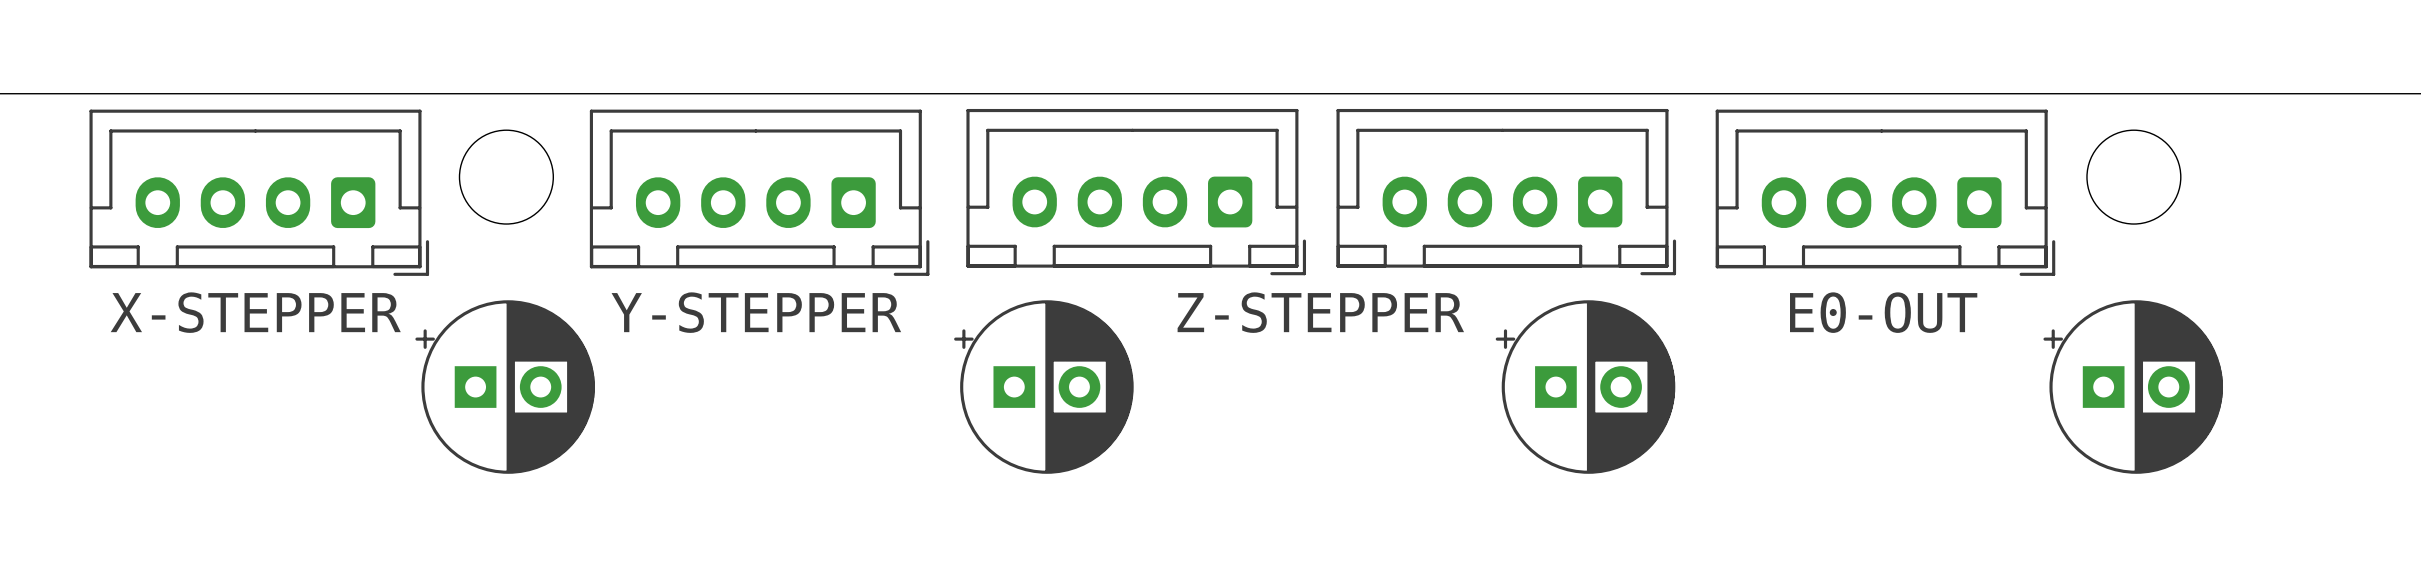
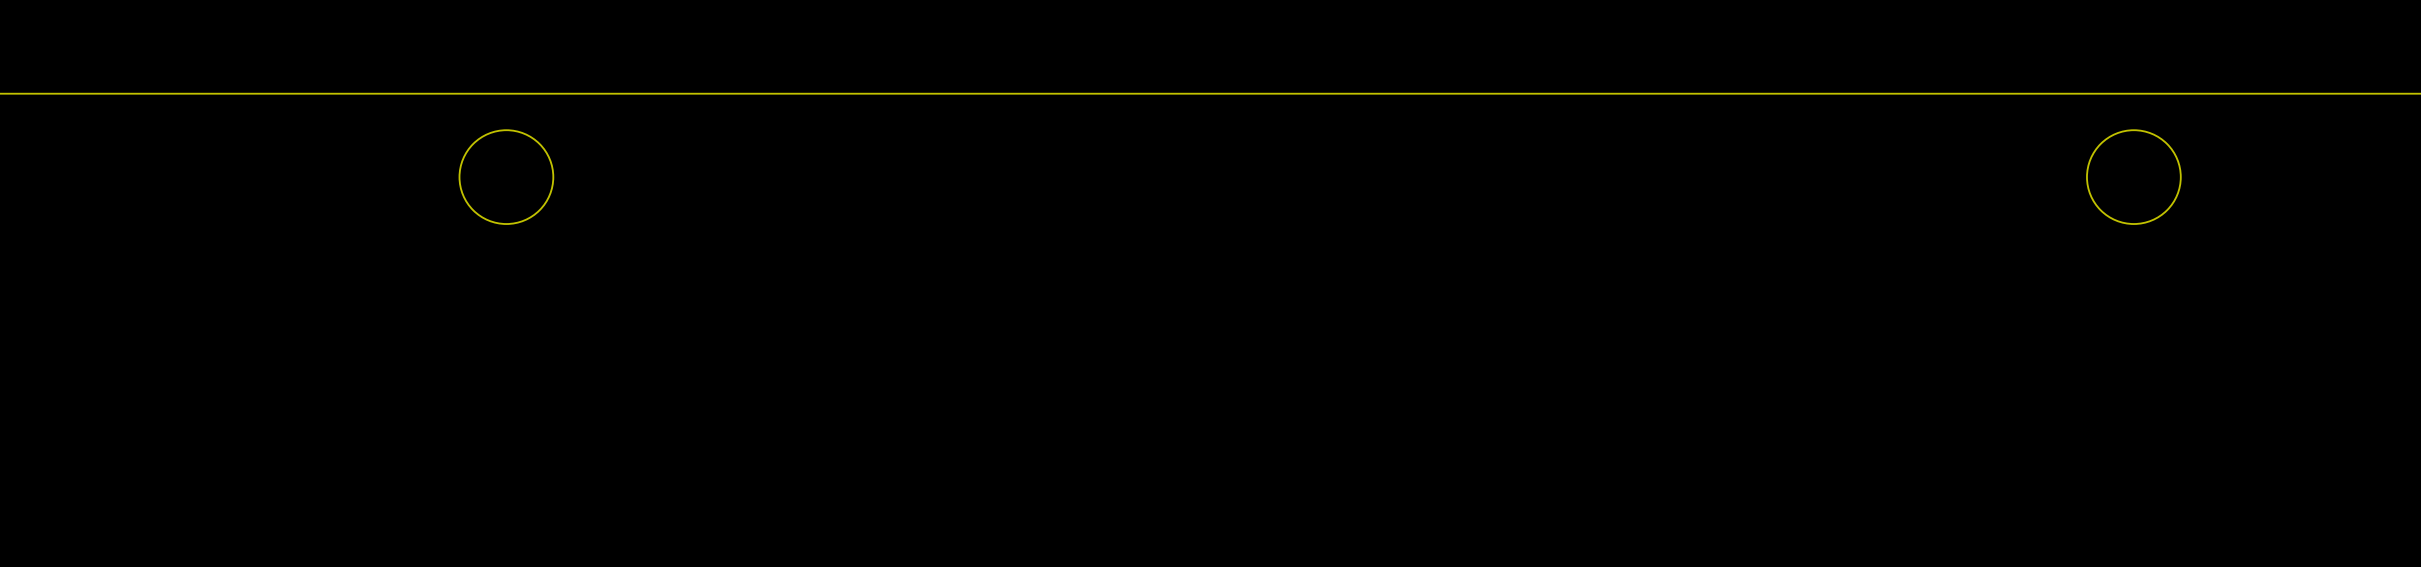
part: (259, 192) -> none
part: (759, 192) -> none
part: (1136, 192) -> none
part: (1506, 192) -> none
part: (1885, 192) -> none
text: X-STEPPER (255, 312) -> none
text: Y-STEPPER (756, 312) -> none
text: Z-STEPPER (1320, 312) -> none
text: E0-OUT (1883, 312) -> none
part: (505, 387) -> none
part: (1043, 387) -> none
part: (1585, 387) -> none
part: (2133, 387) -> none

